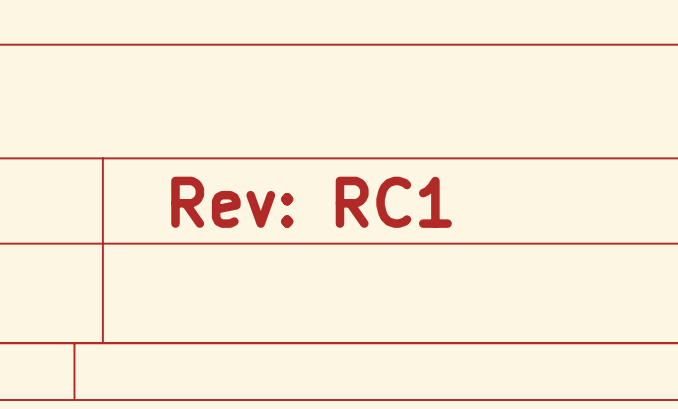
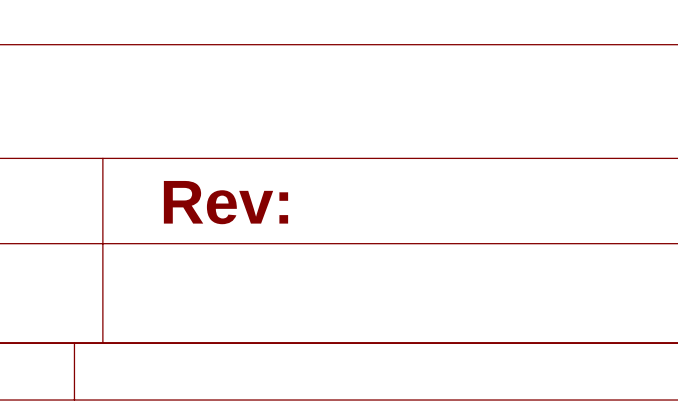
title block: Rev: RC1 (311, 202) -> Rev: (226, 202)

